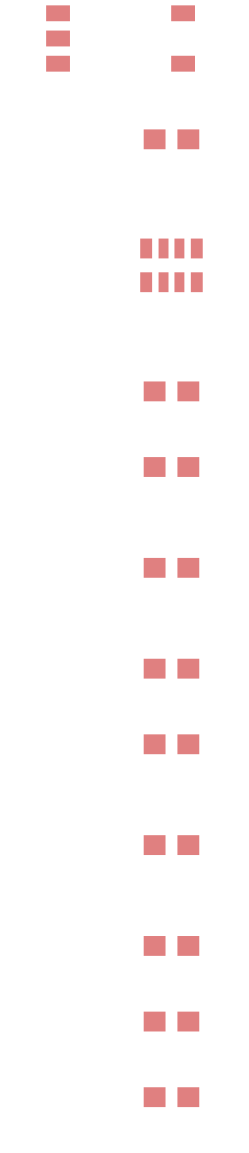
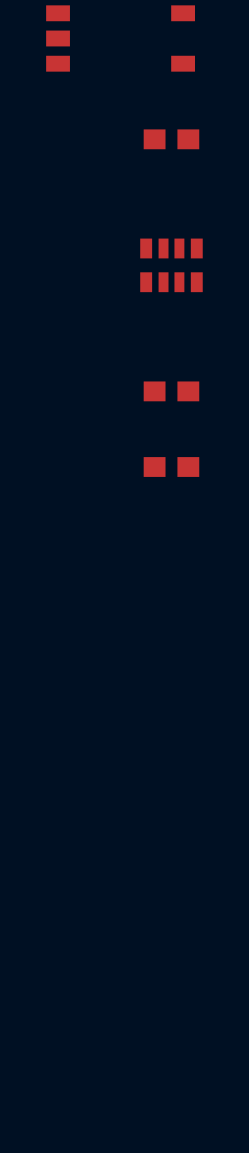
part: (171, 567) -> none
part: (171, 668) -> none
part: (171, 744) -> none
part: (171, 845) -> none
part: (171, 945) -> none
part: (171, 1021) -> none
part: (171, 1097) -> none

